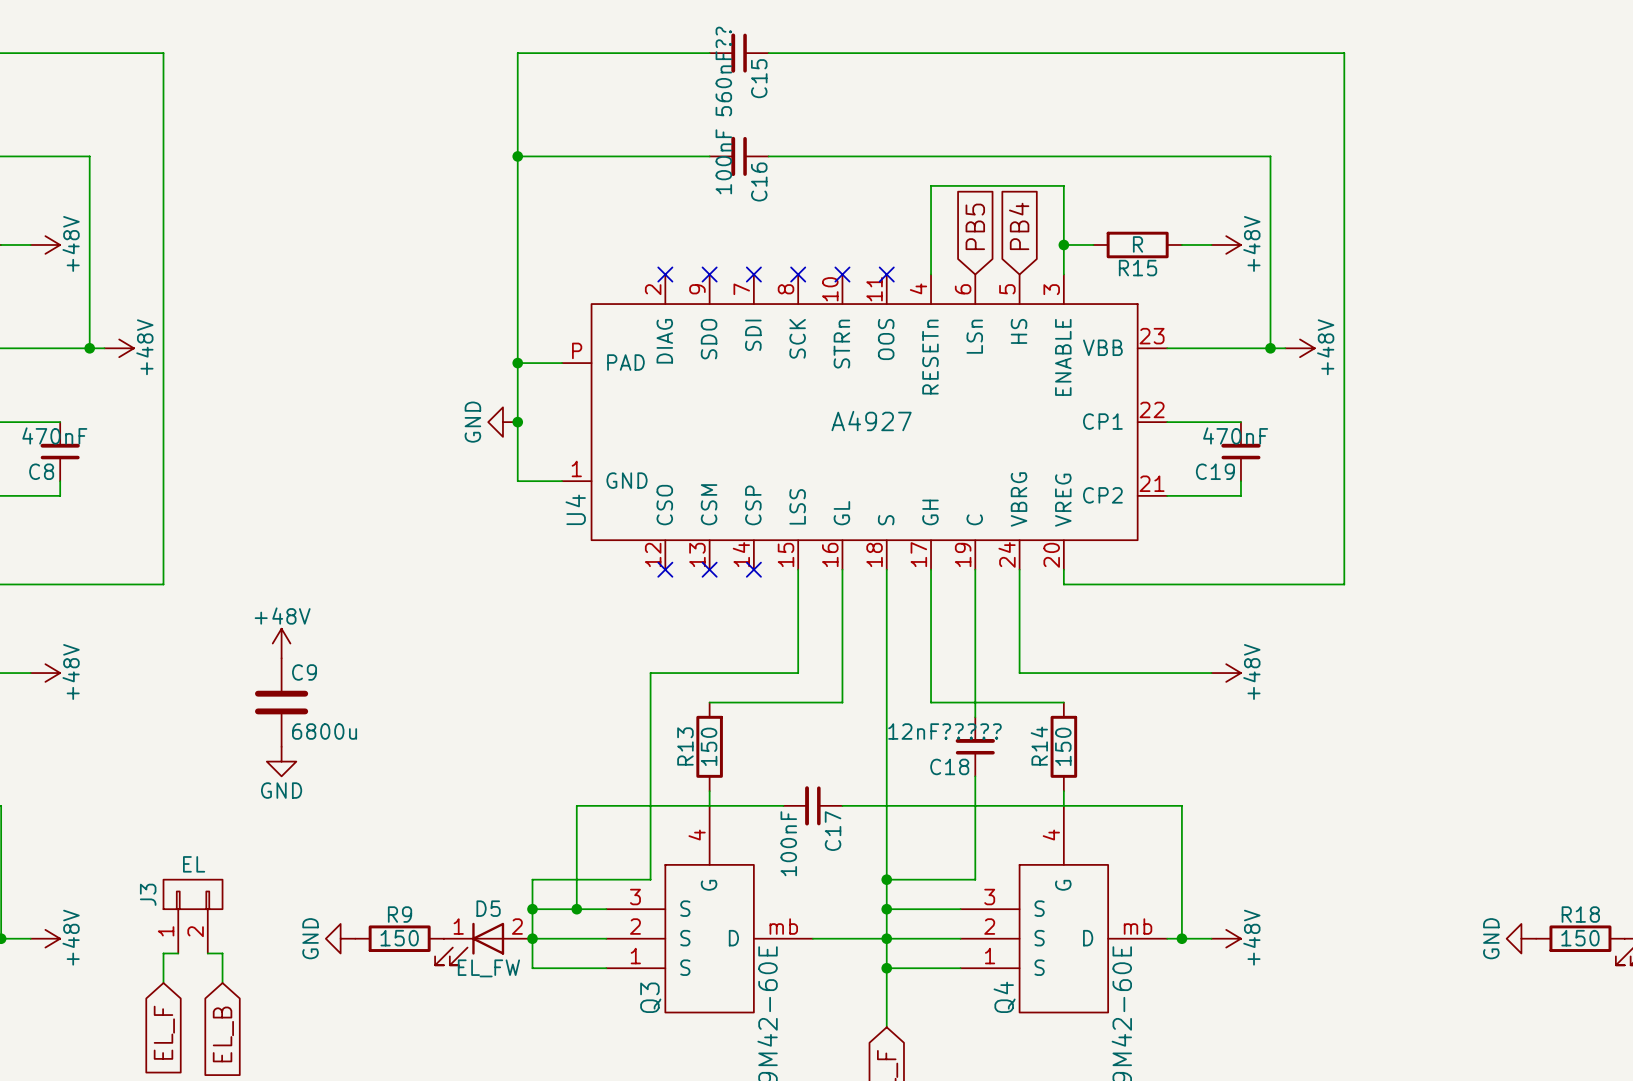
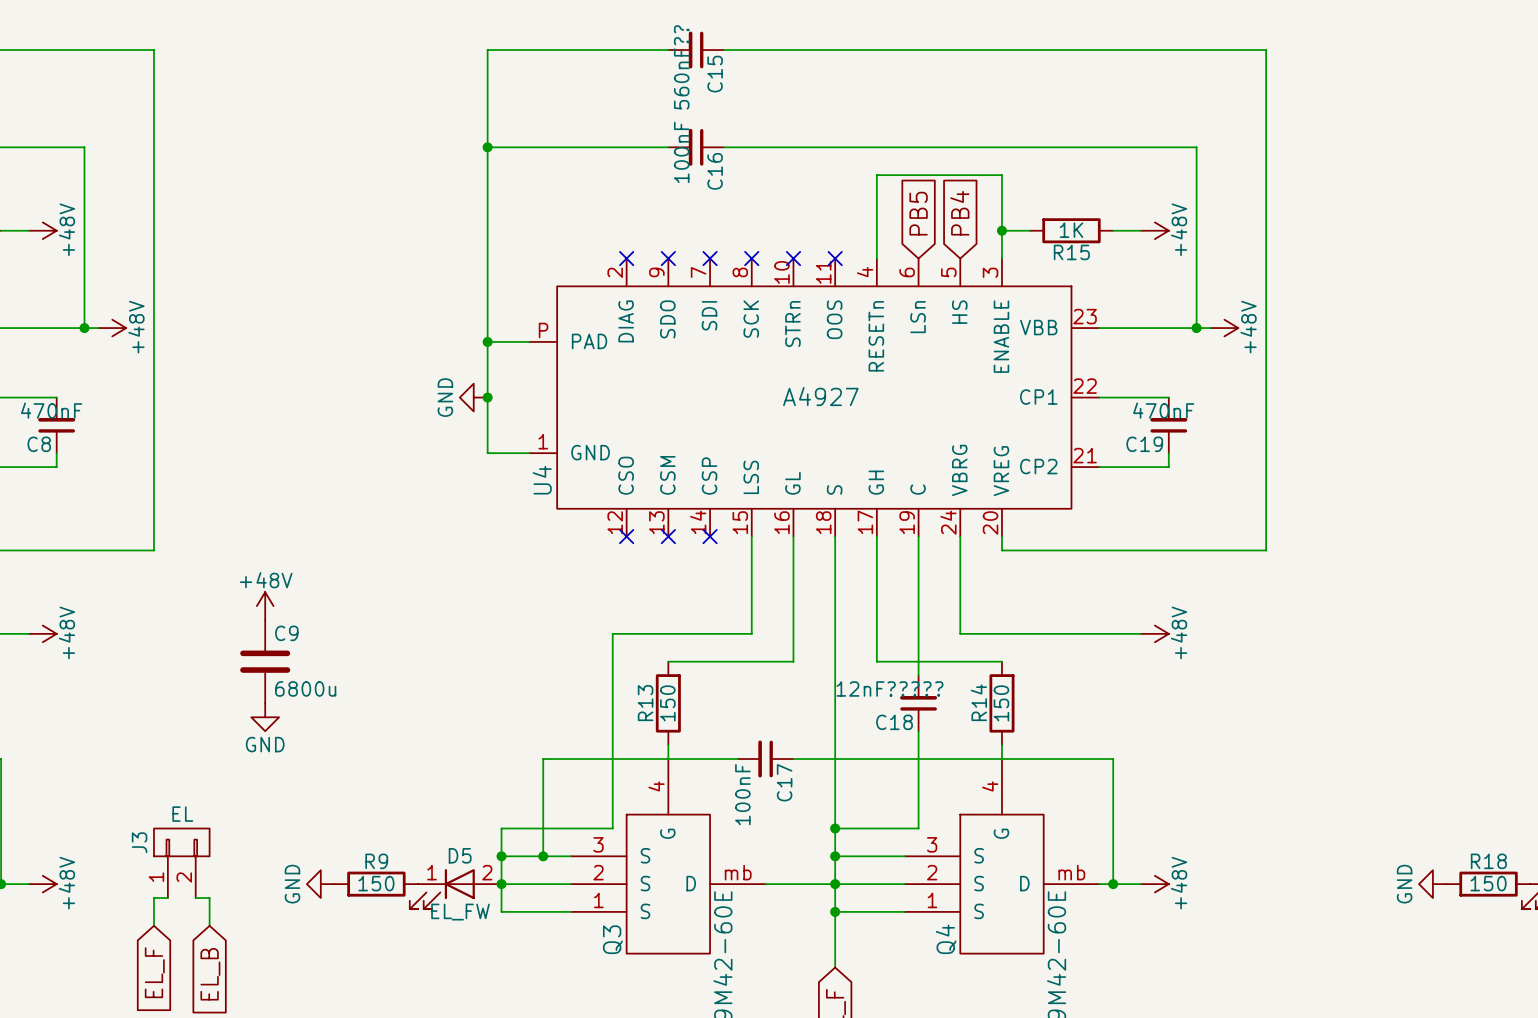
R15 value: R (1138, 244) -> 1K (1071, 230)

